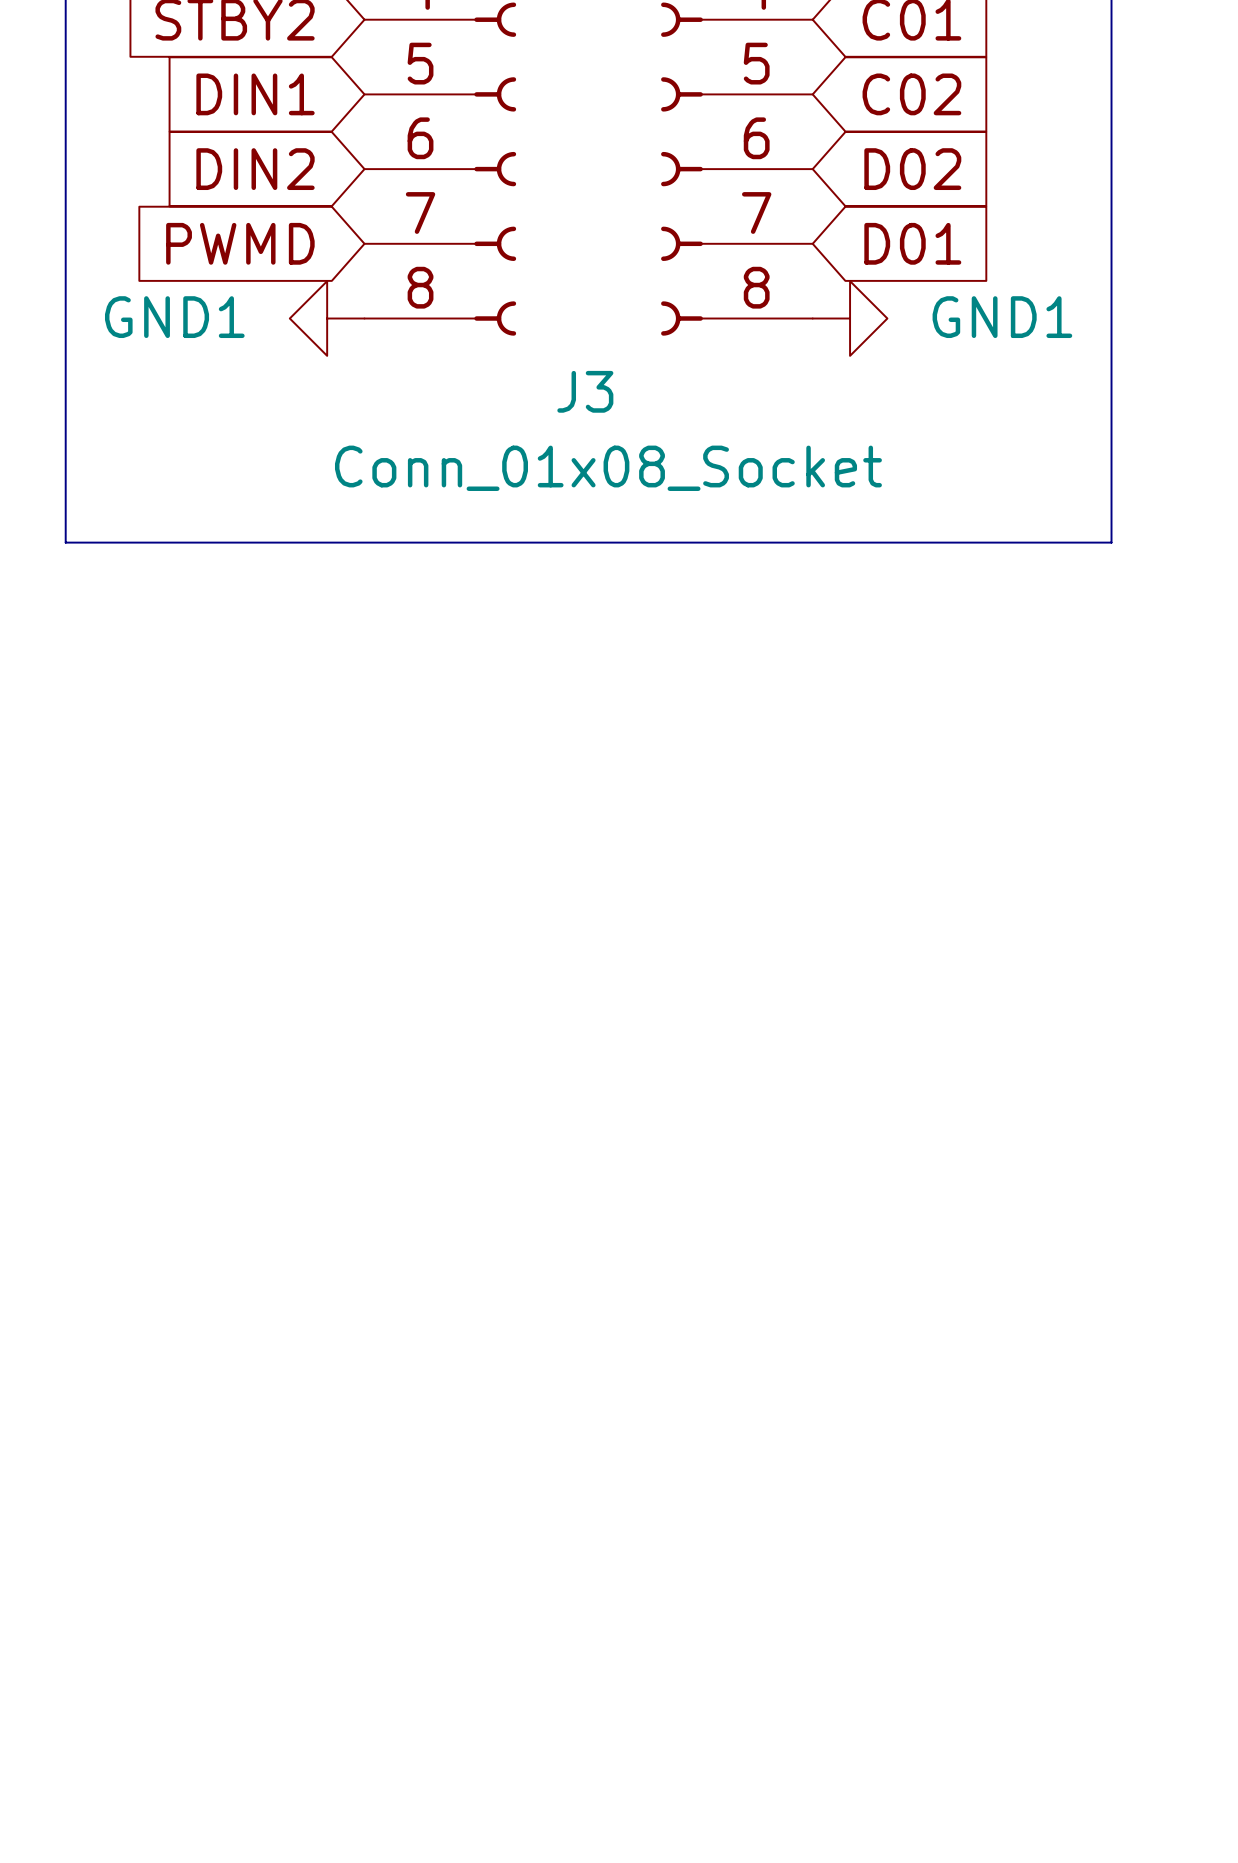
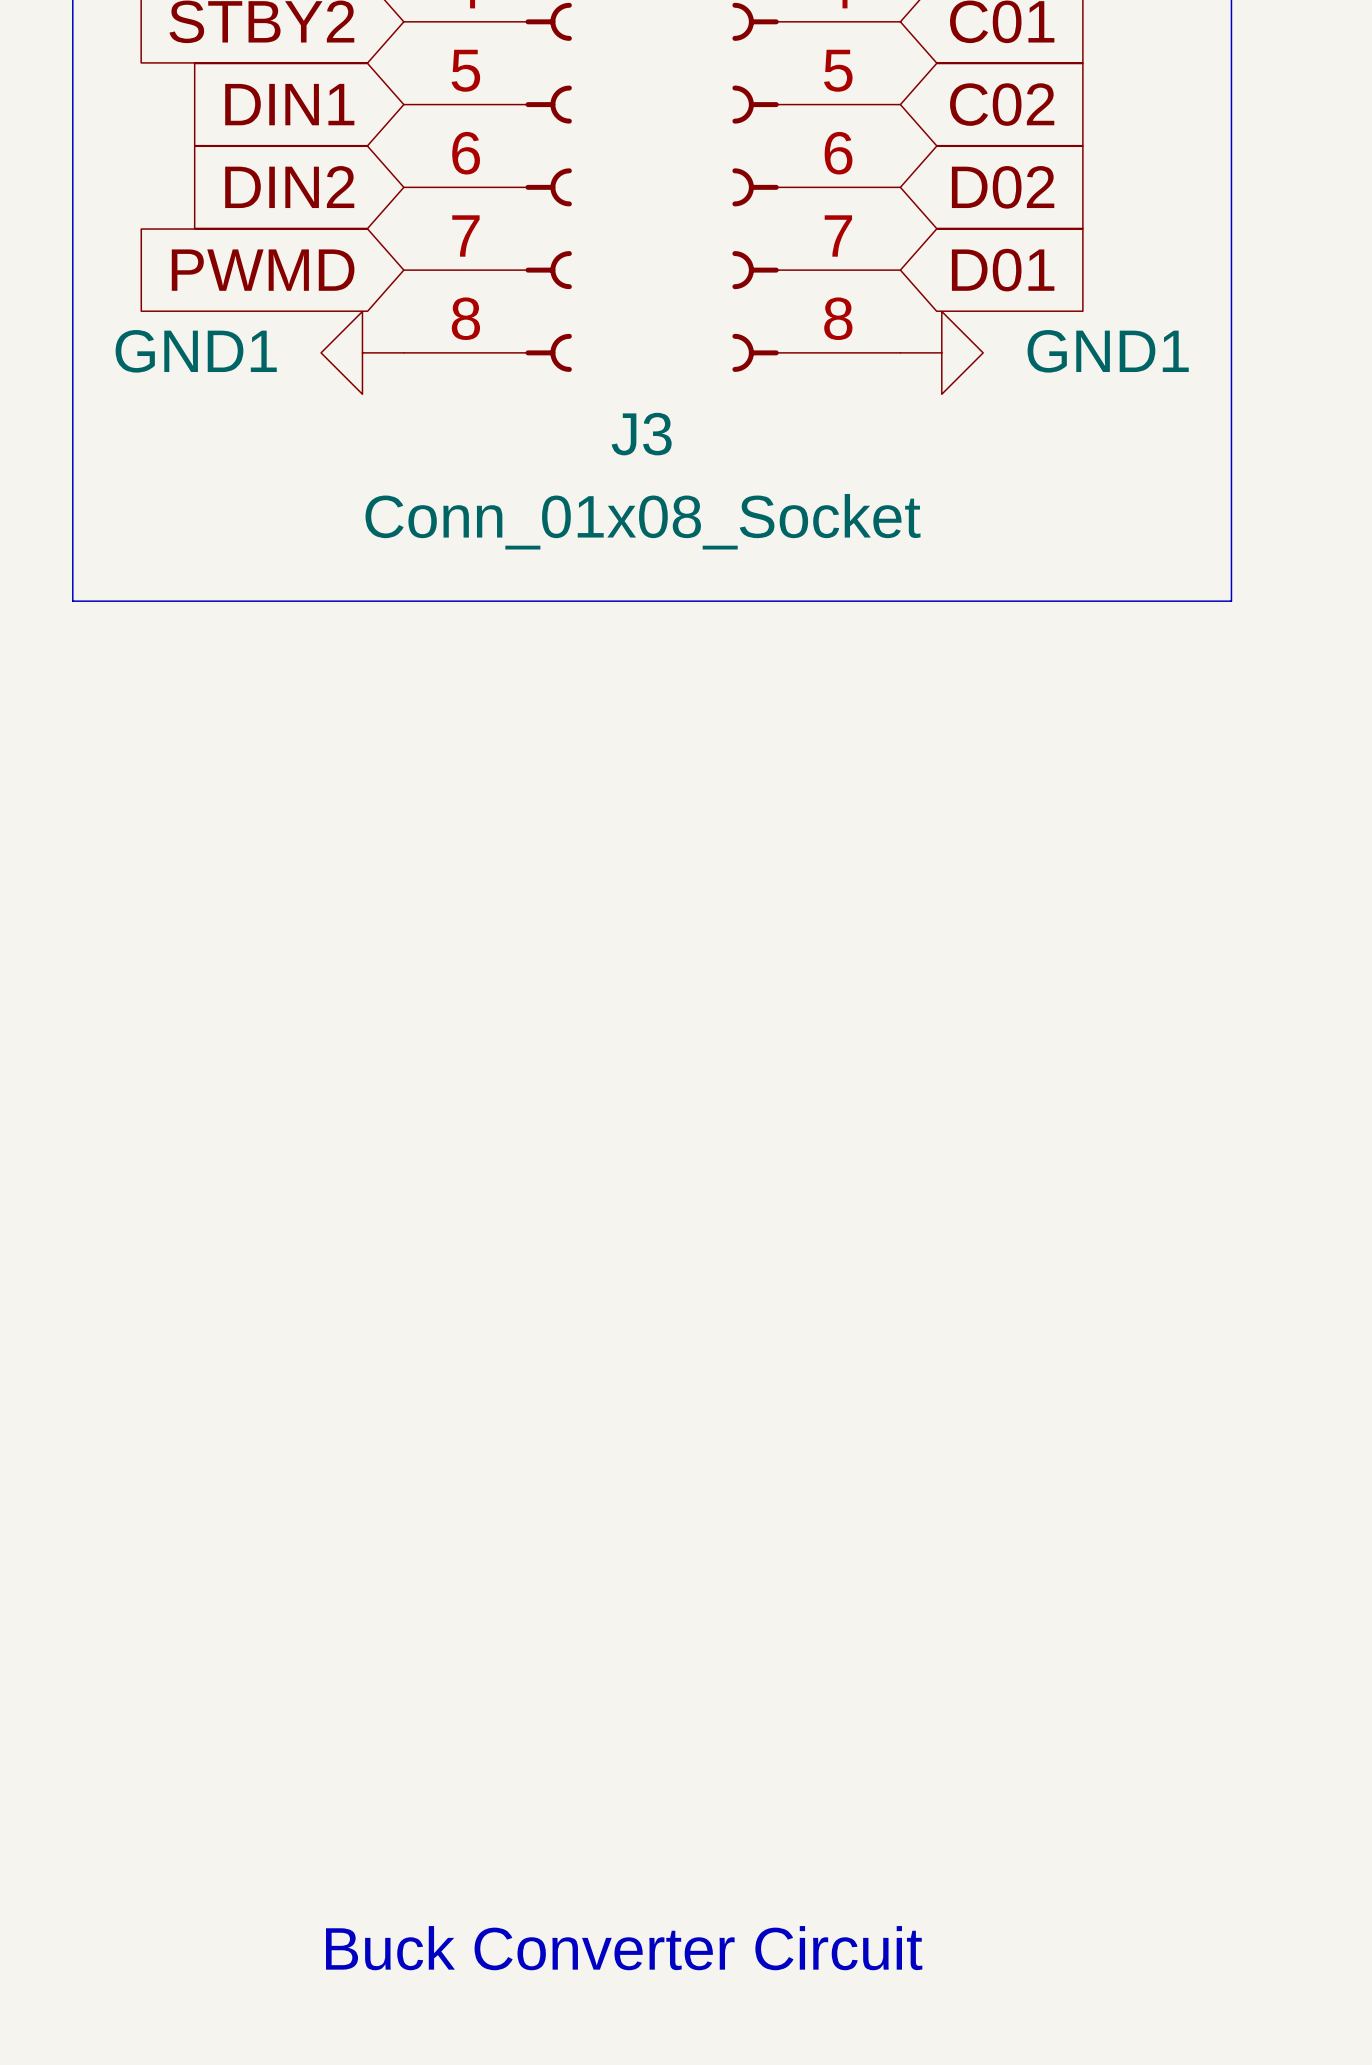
text: none -> Buck Converter Circuit (624, 1948)

